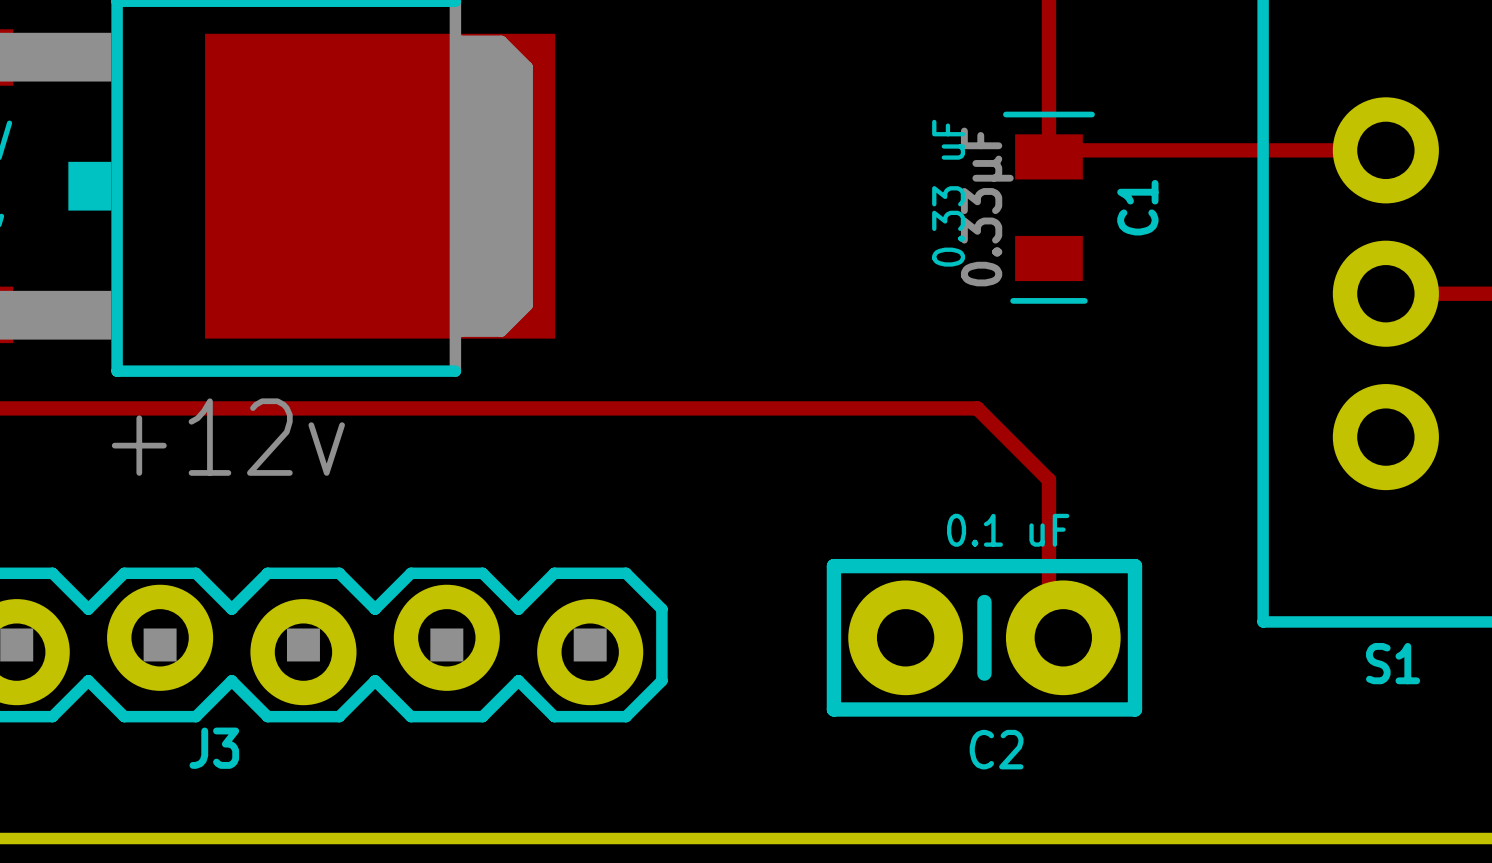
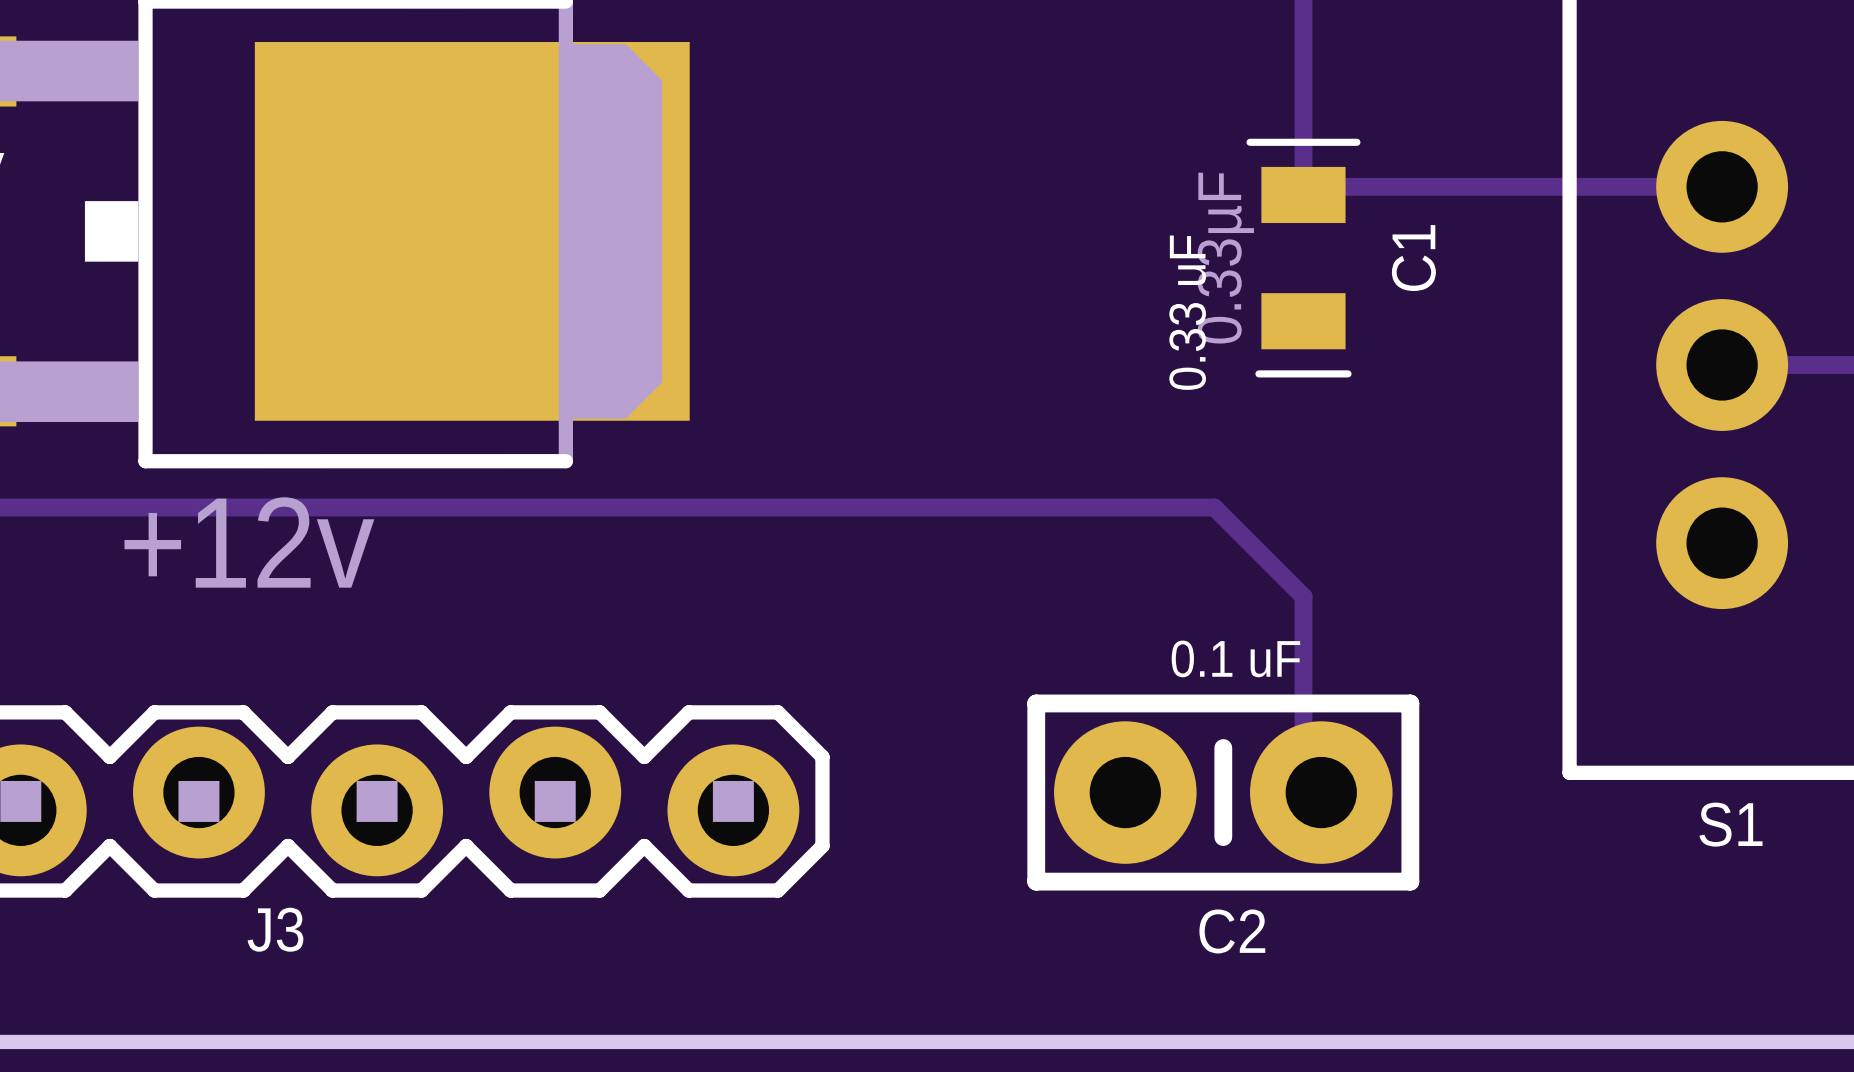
text position: 0.33 uF (948, 193) -> 0.33 uF (1187, 312)

